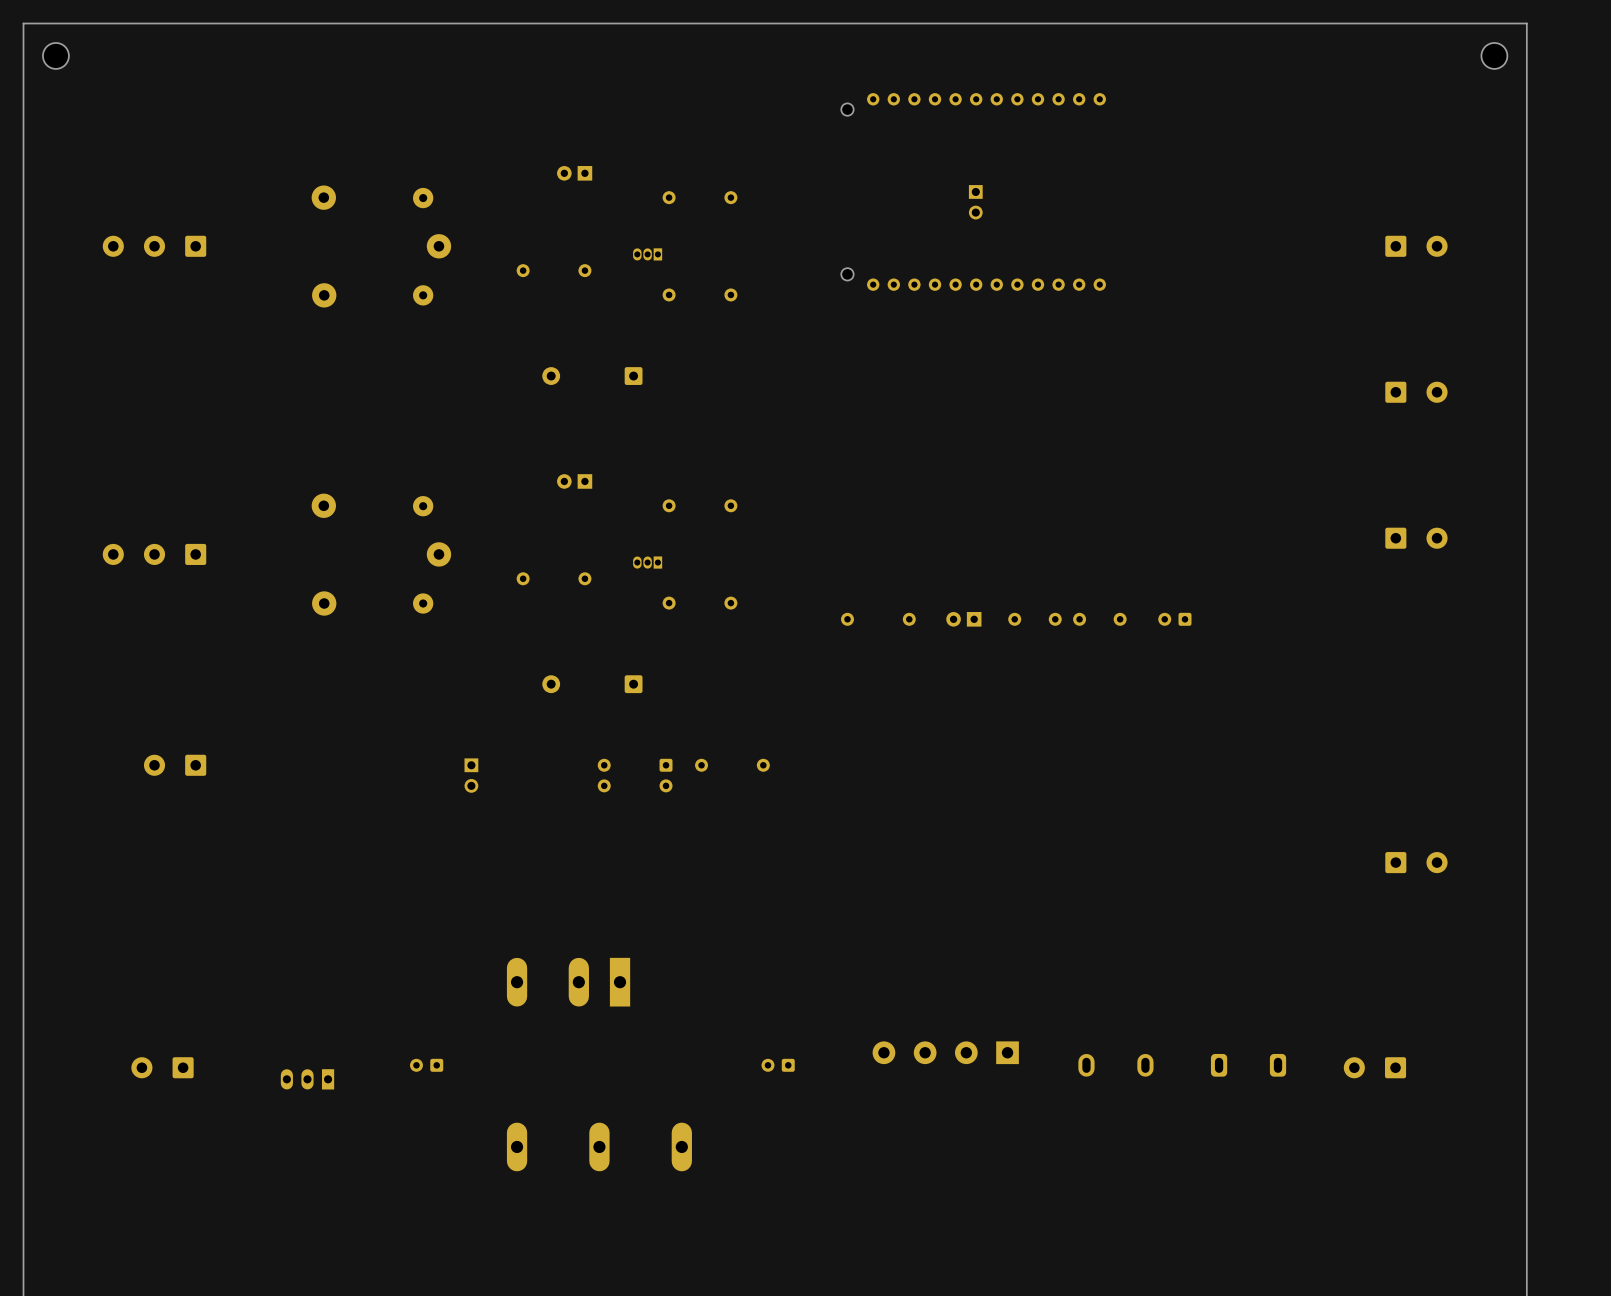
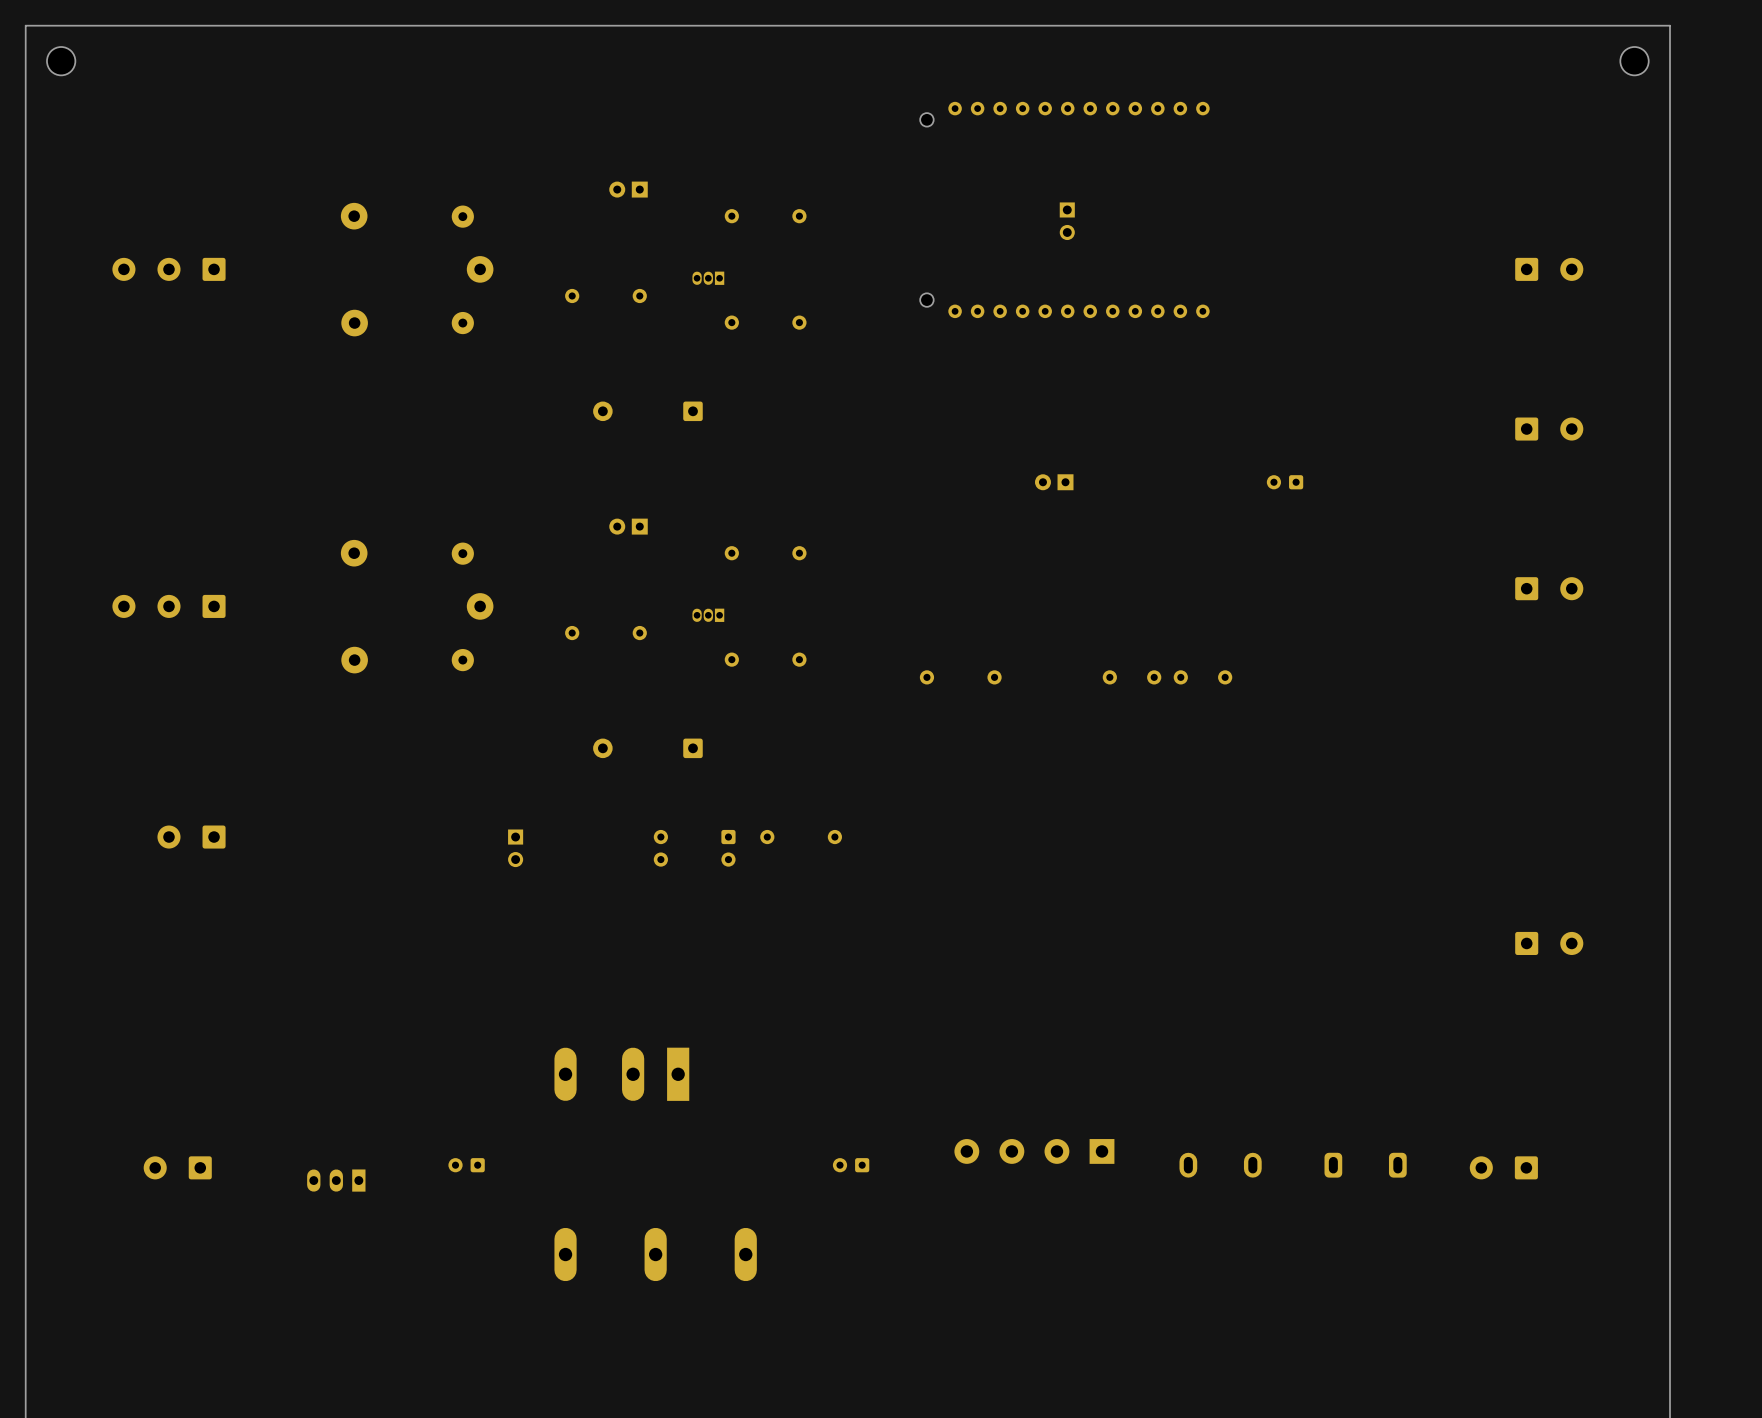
part position: (963, 619) -> (1054, 482)
part position: (1174, 619) -> (1285, 482)

